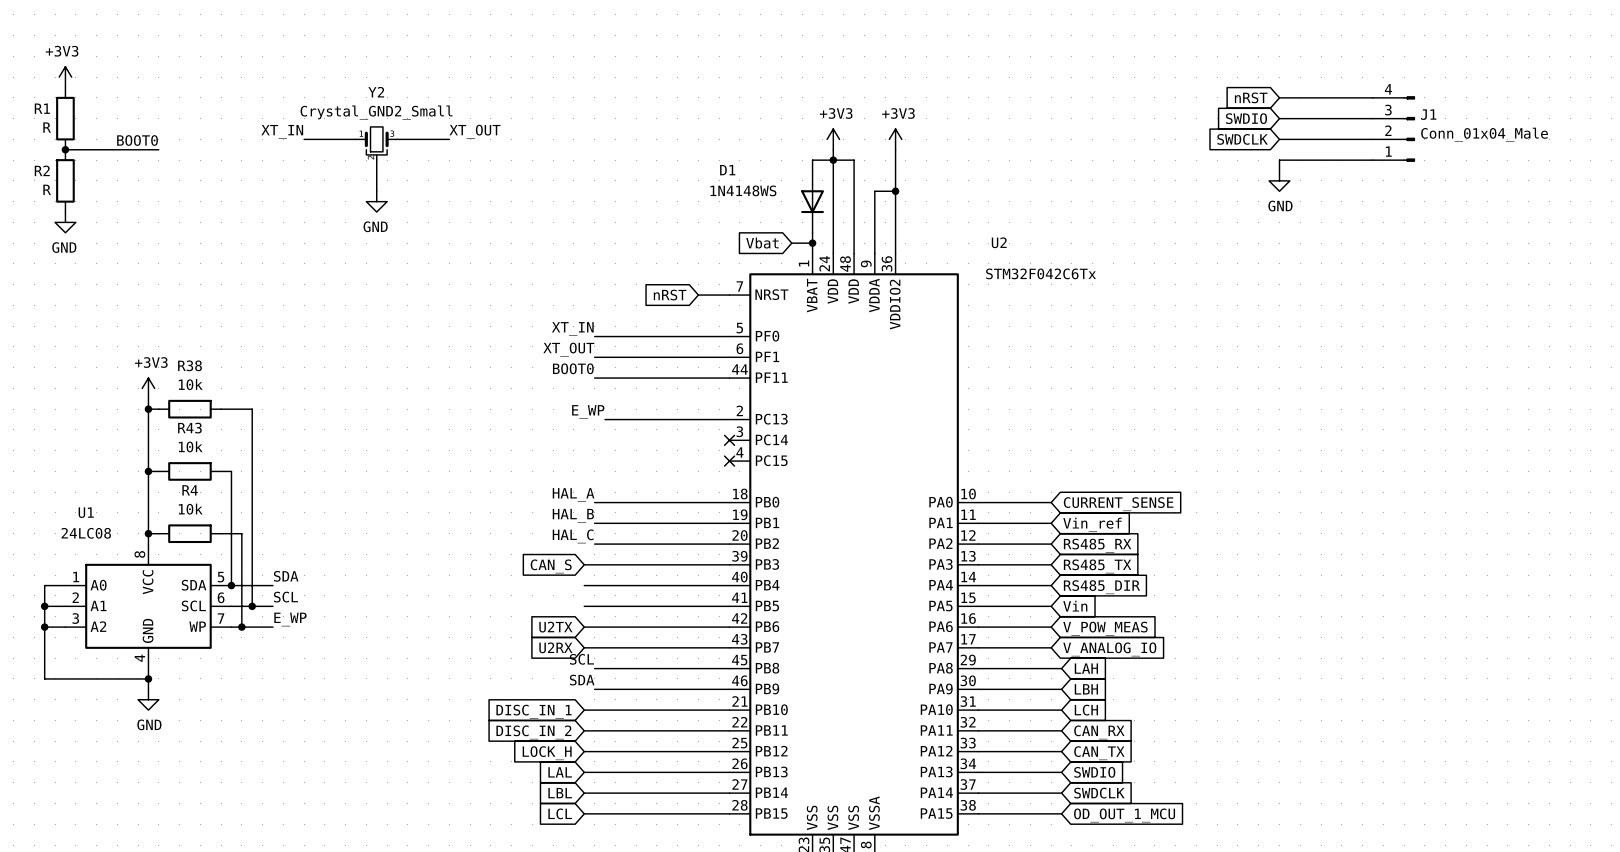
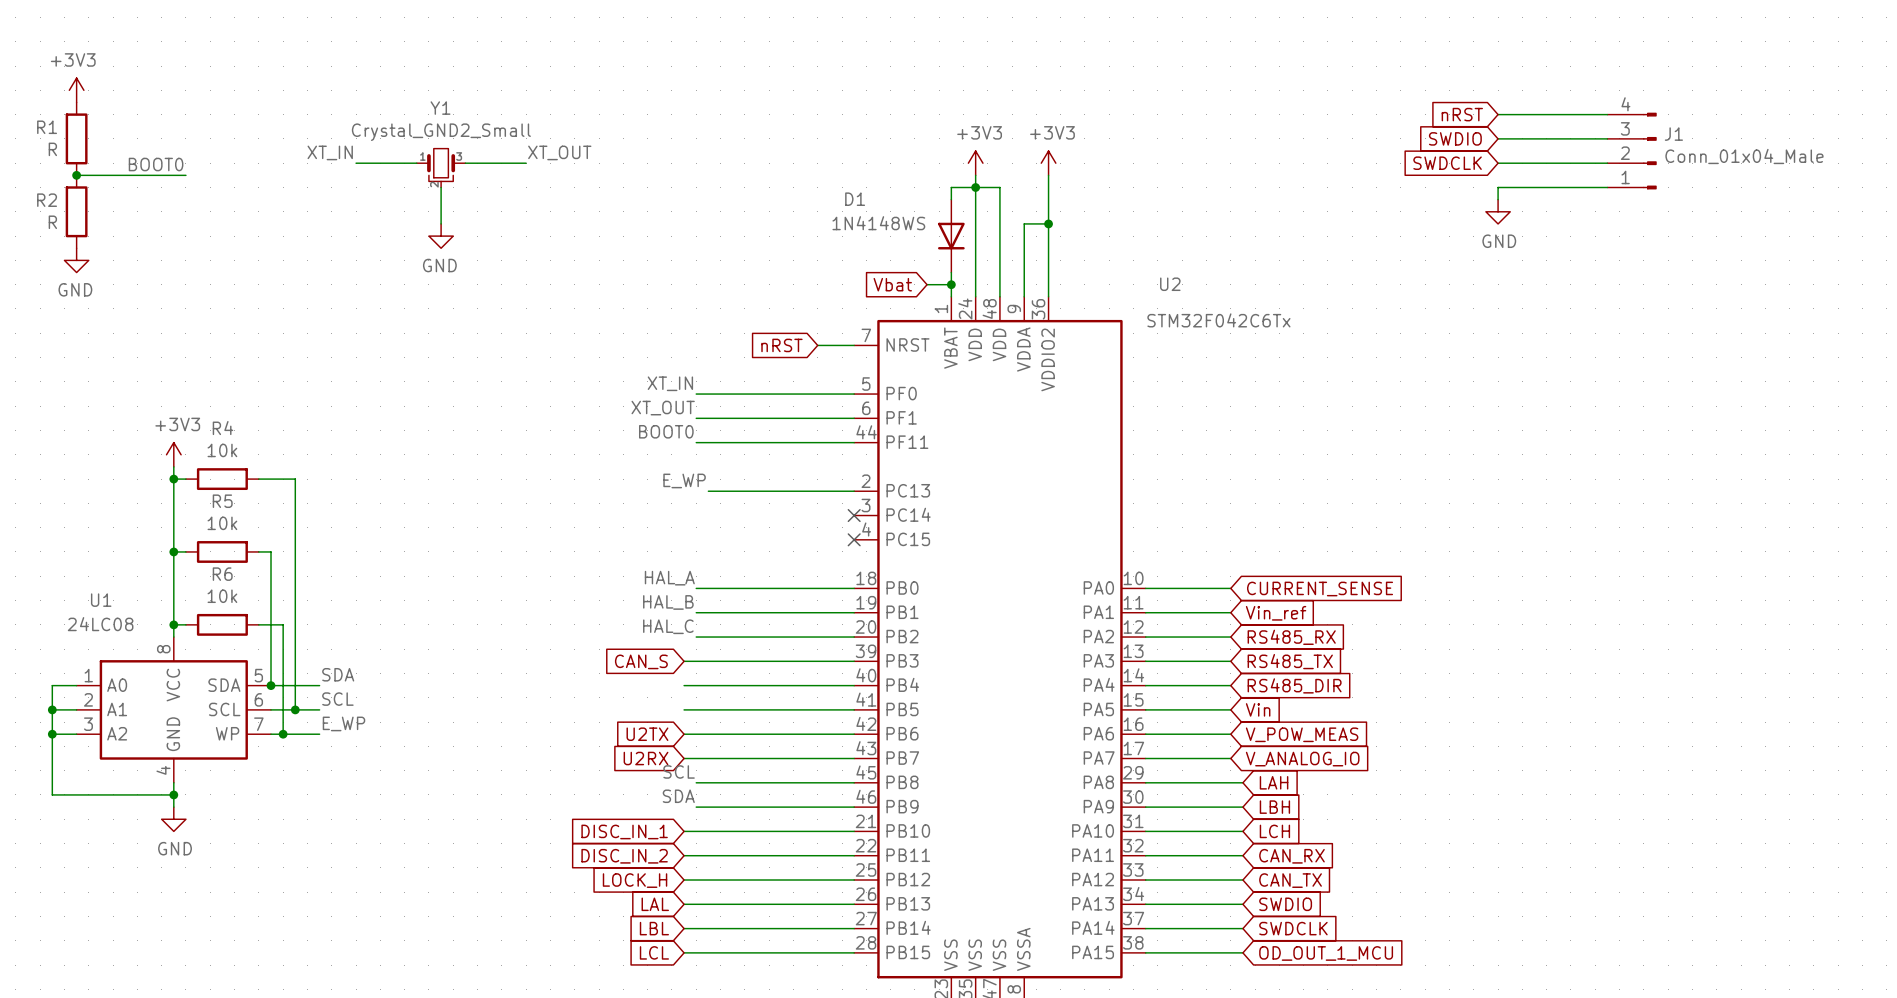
Y2 name: Y2 (376, 92) -> Y1 (440, 108)
R38 name: R38 (190, 365) -> R4 (222, 428)
R43 name: R43 (189, 428) -> R5 (222, 501)
R4 name: R4 (190, 490) -> R6 (222, 574)

